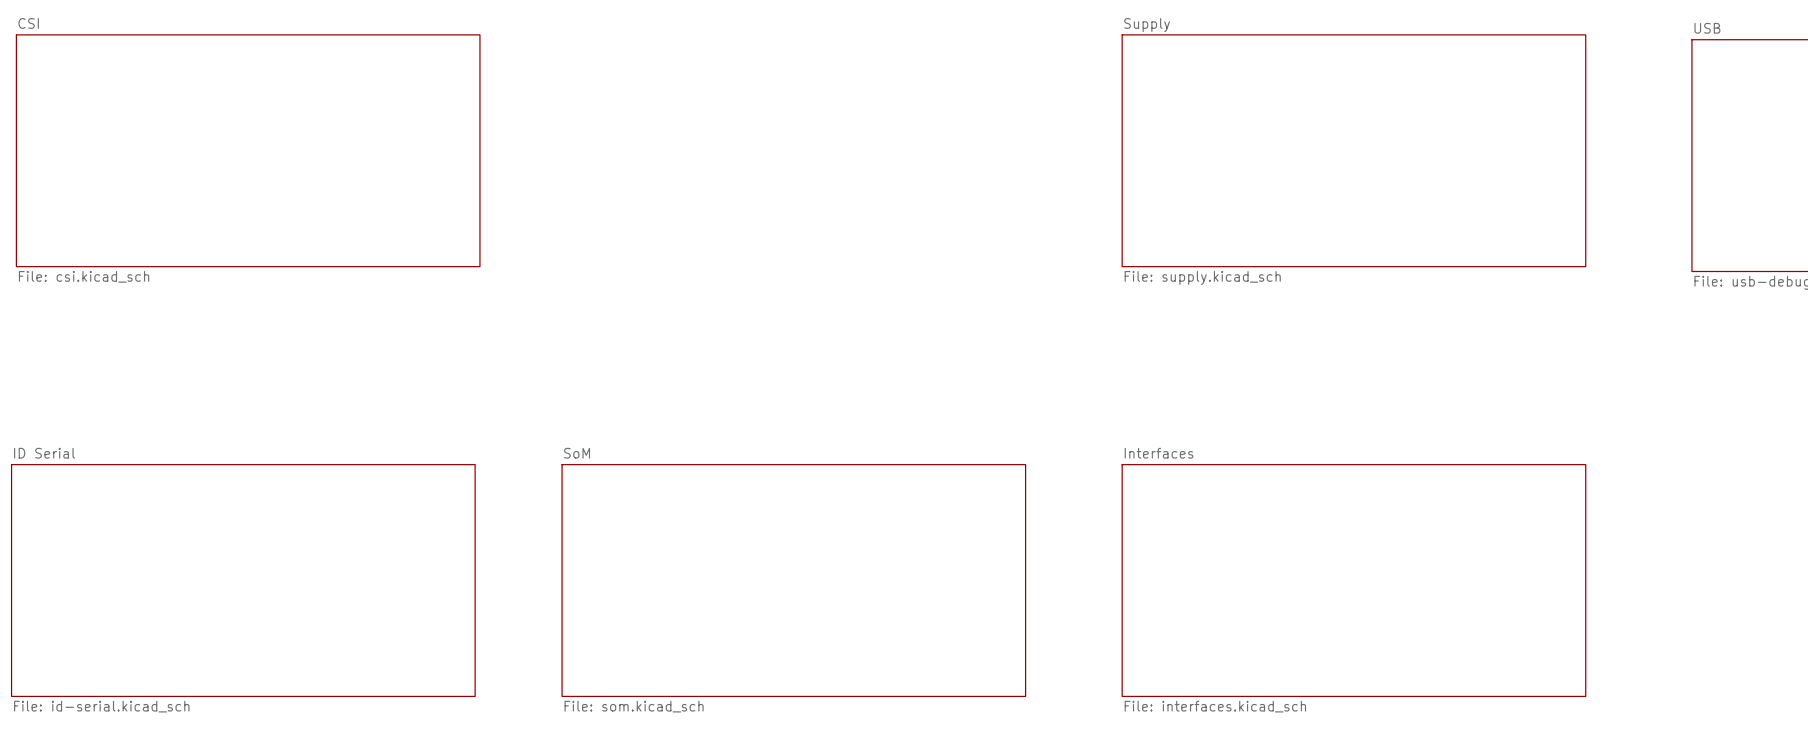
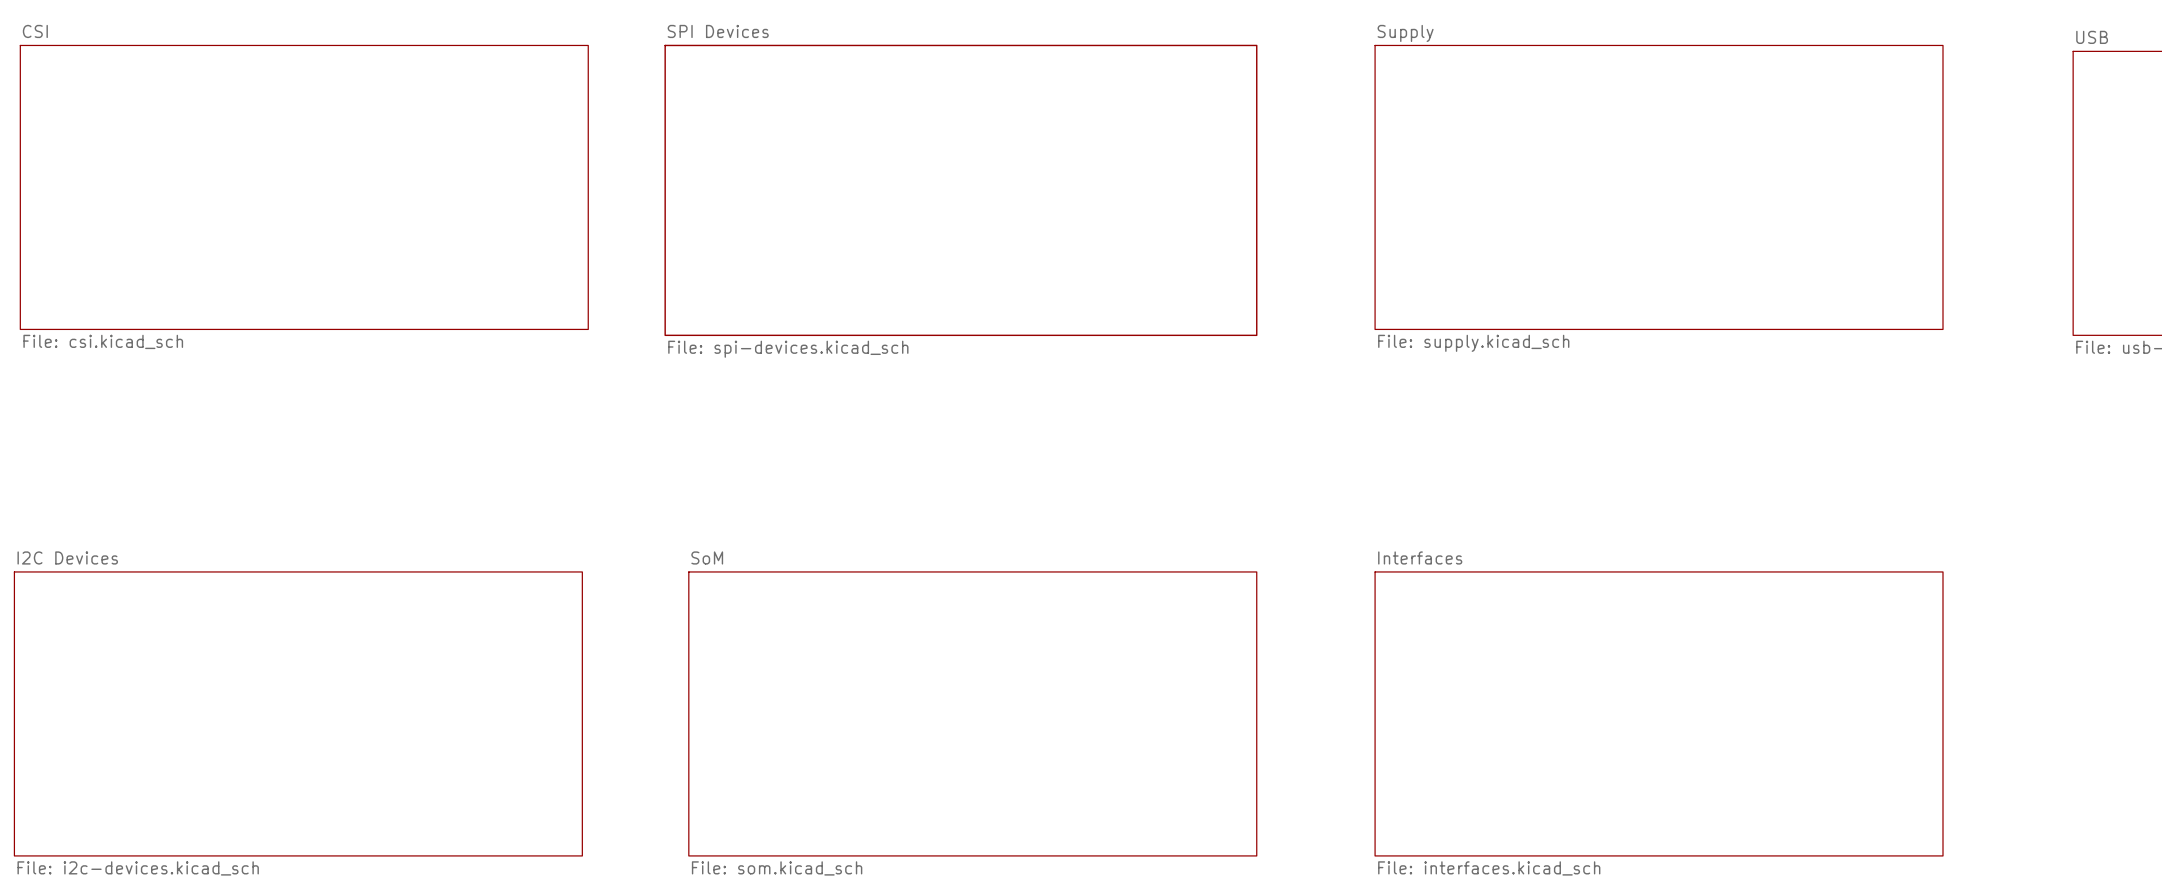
sheet SPI Devices: none -> File: spi-devices.kicad_sch (960, 190)
sheet ID Serial name: ID Serial (44, 453) -> I2C Devices (67, 557)
sheet ID Serial value: File: id-serial.kicad_sch (101, 706) -> File: i2c-devices.kicad_sch (138, 868)

